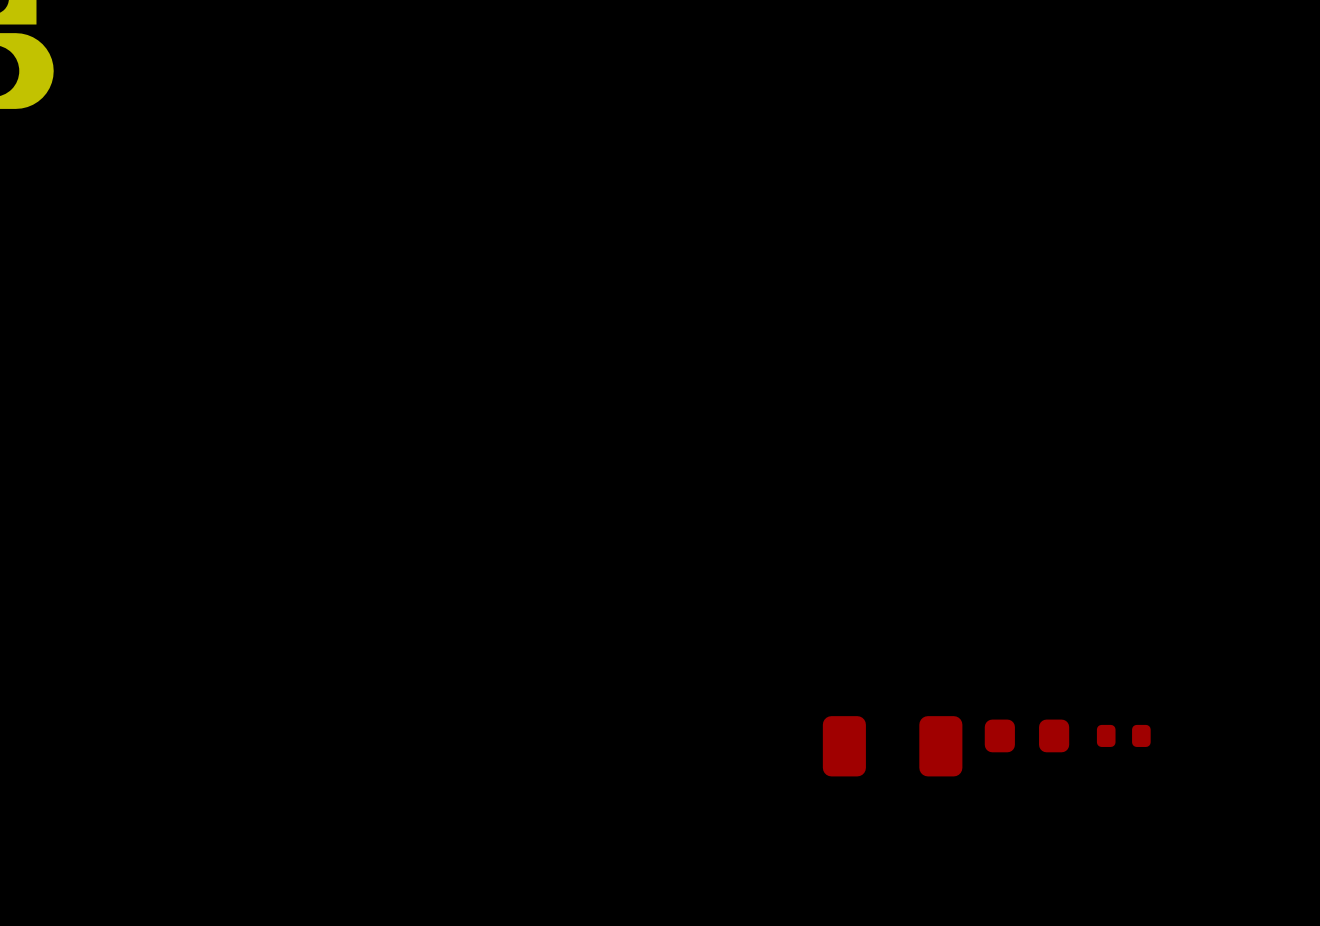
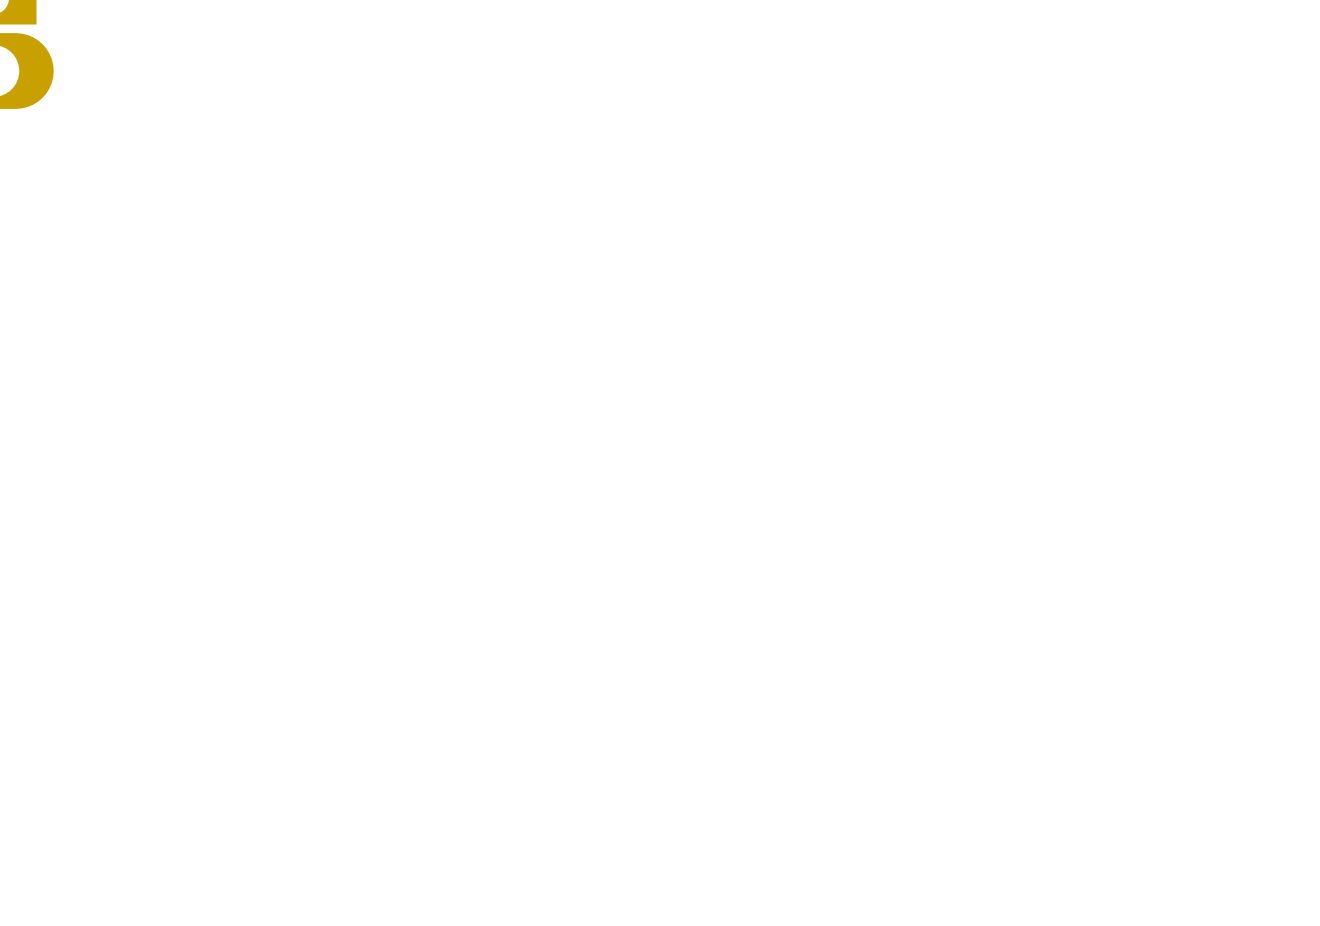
part: (1026, 735) -> none
part: (1123, 735) -> none
part: (892, 746) -> none

